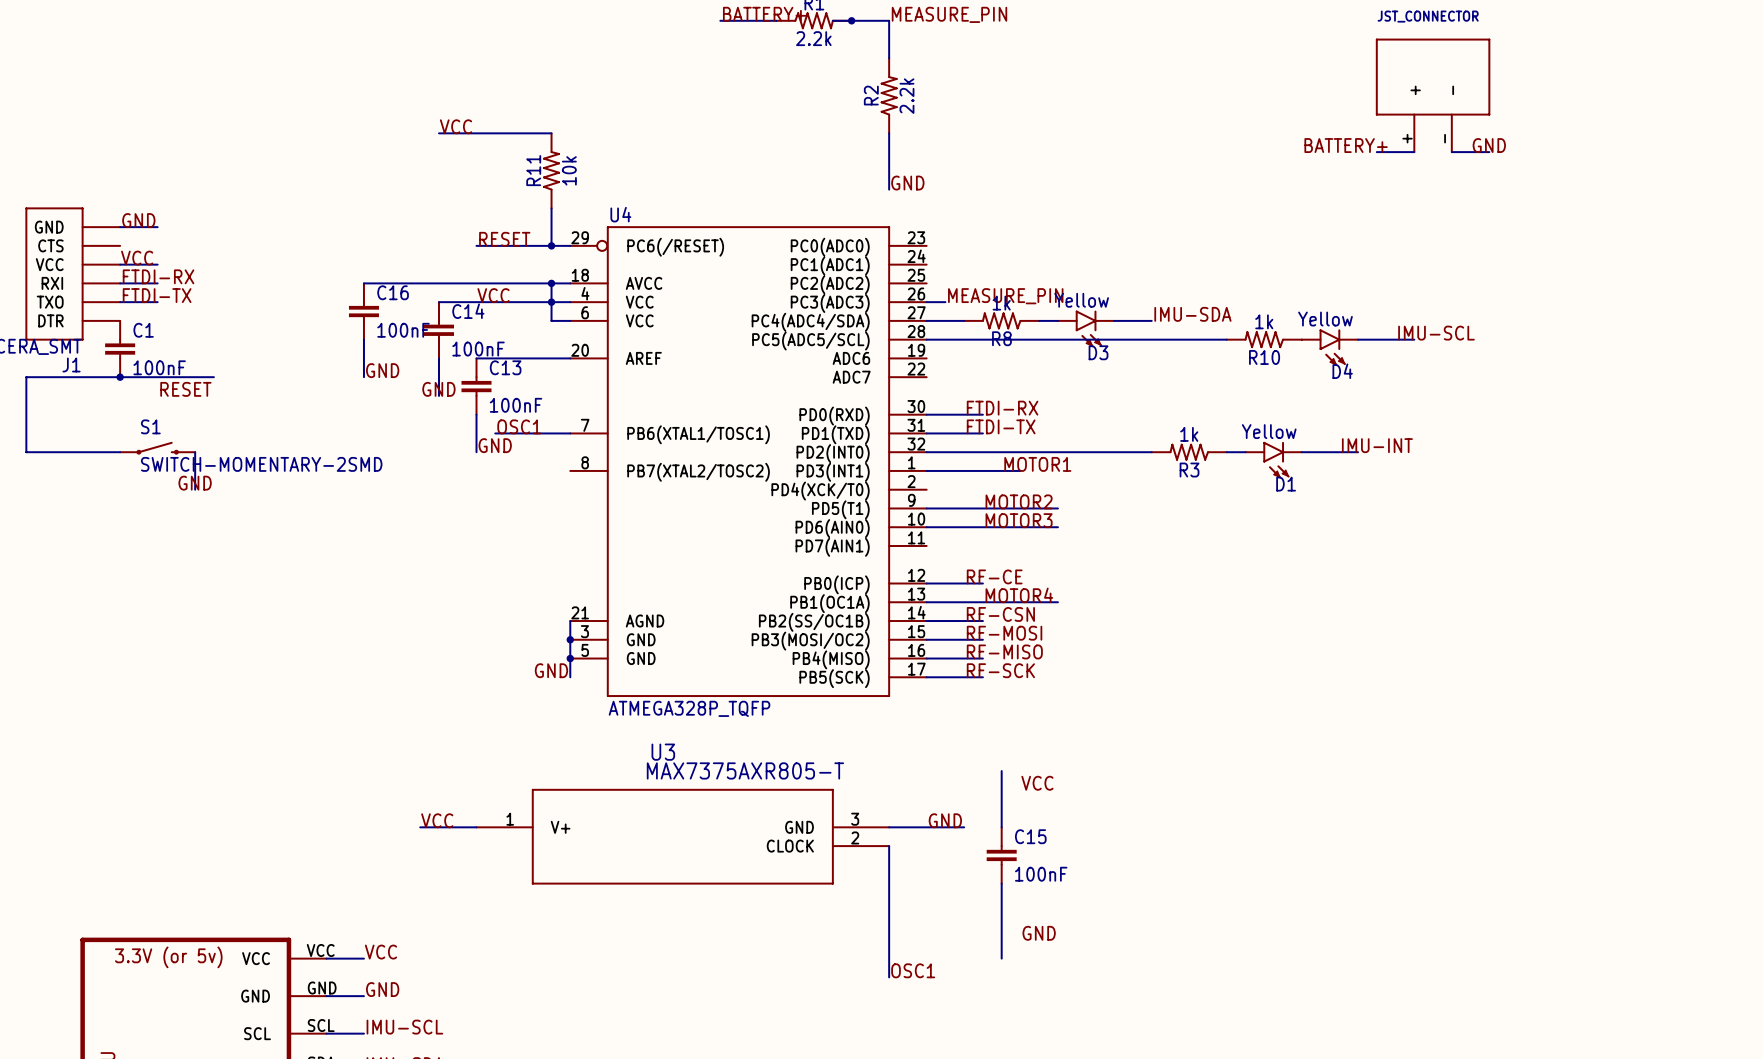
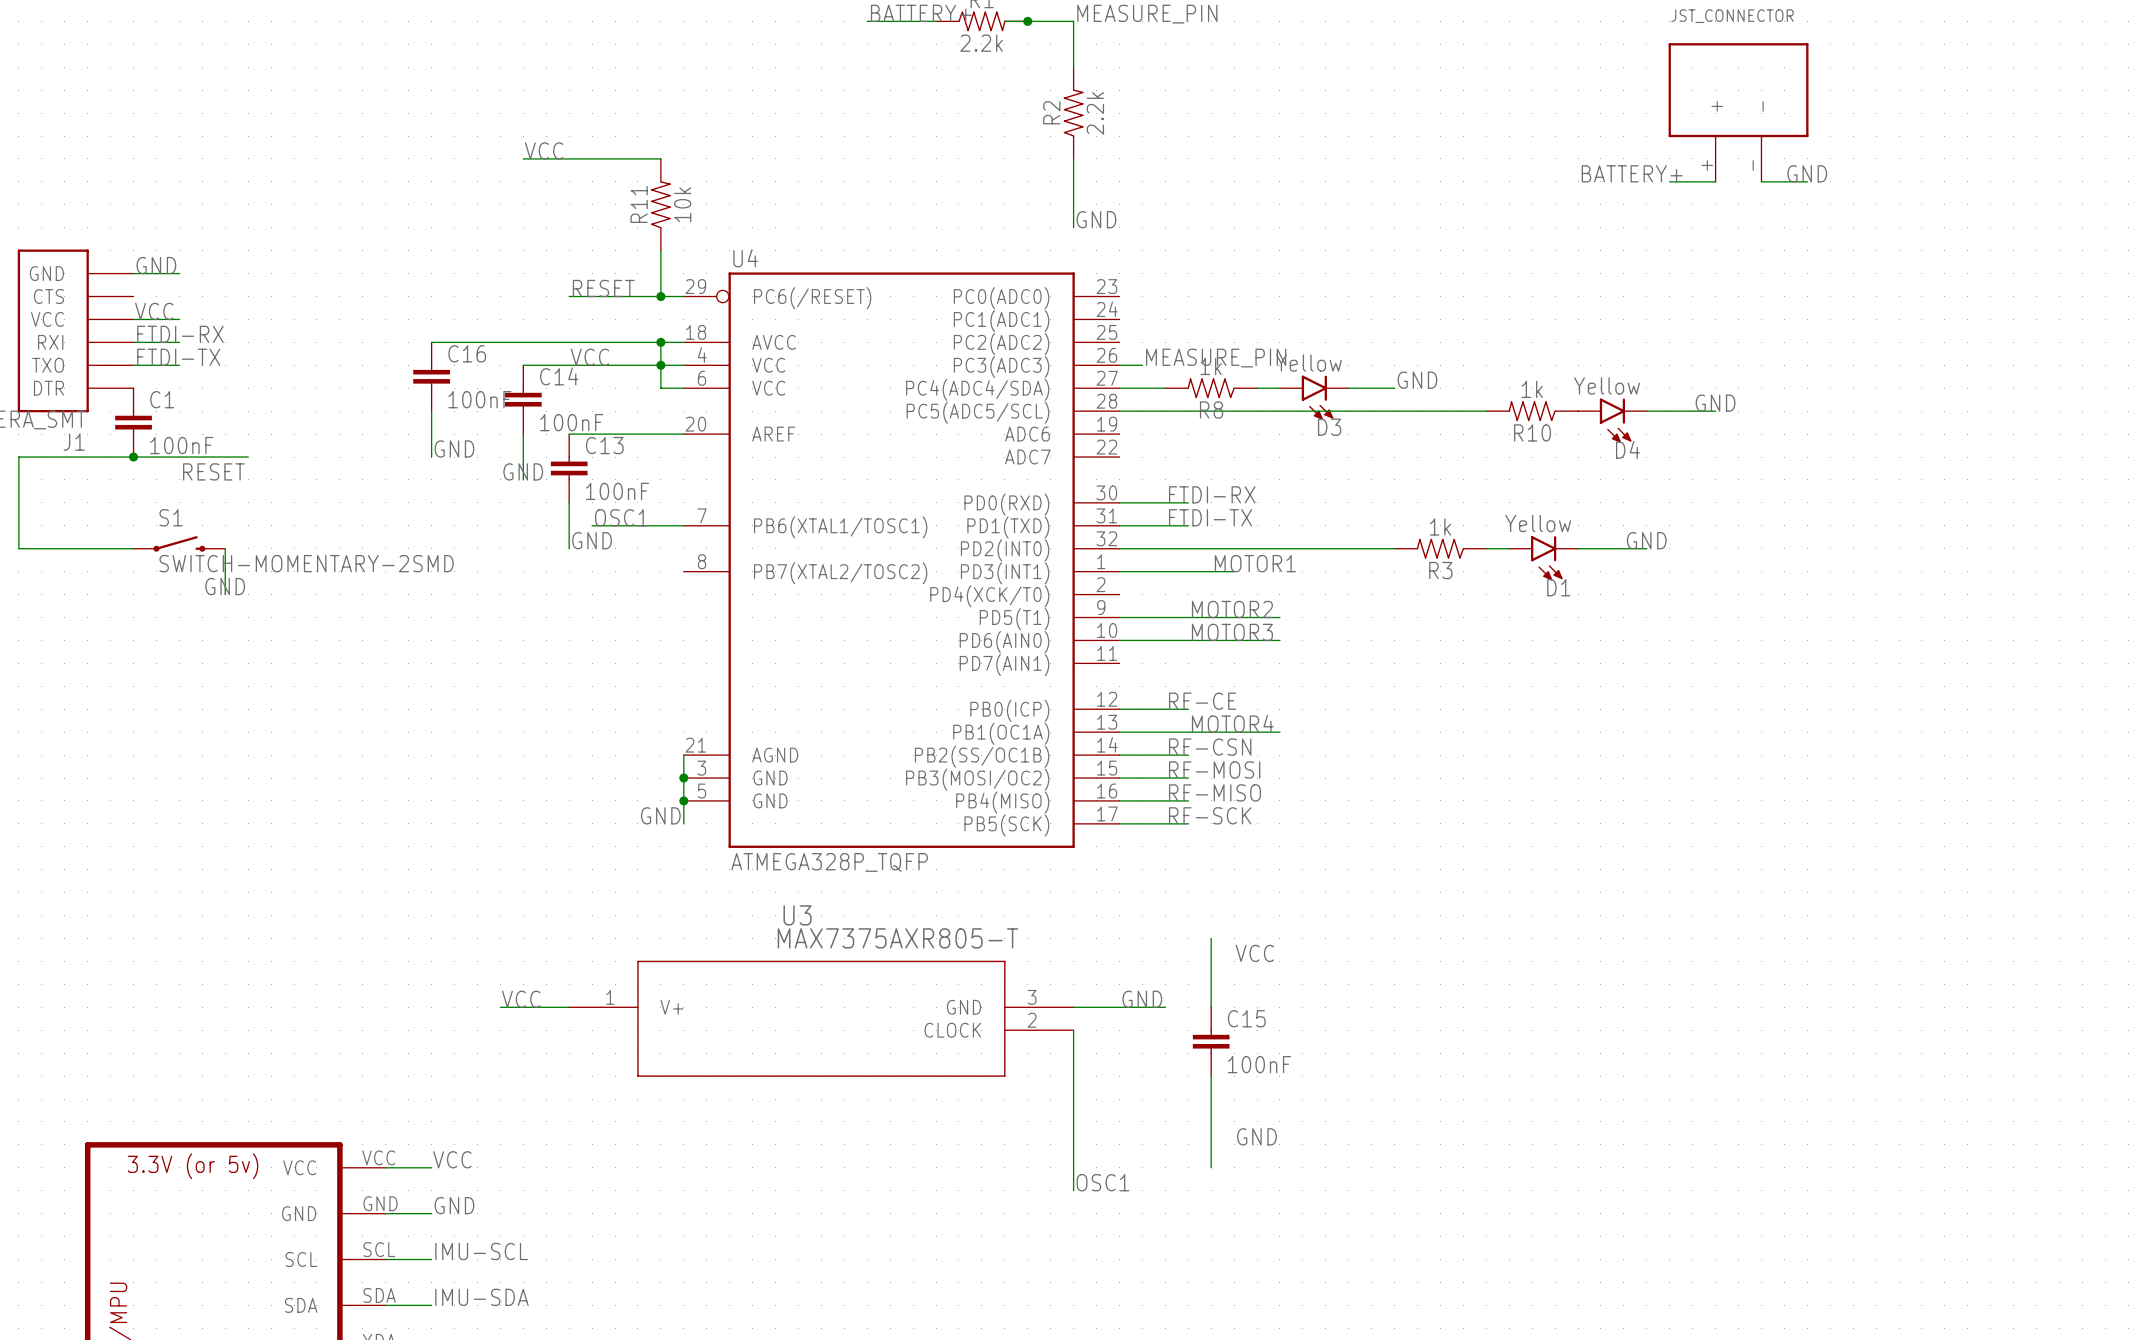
label: IMU-SDA (1192, 314) -> GND (1417, 380)
label: IMU-SCL (1436, 333) -> GND (1715, 403)
label: IMU-INT (1377, 445) -> GND (1646, 540)

